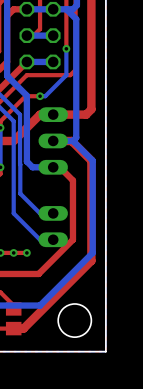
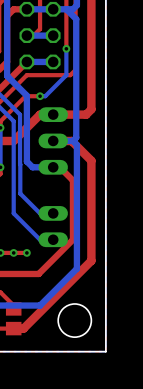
bottom track: (76, 144) (92, 160) (92, 252) (76, 268) -> (76, 144) (76, 268)

